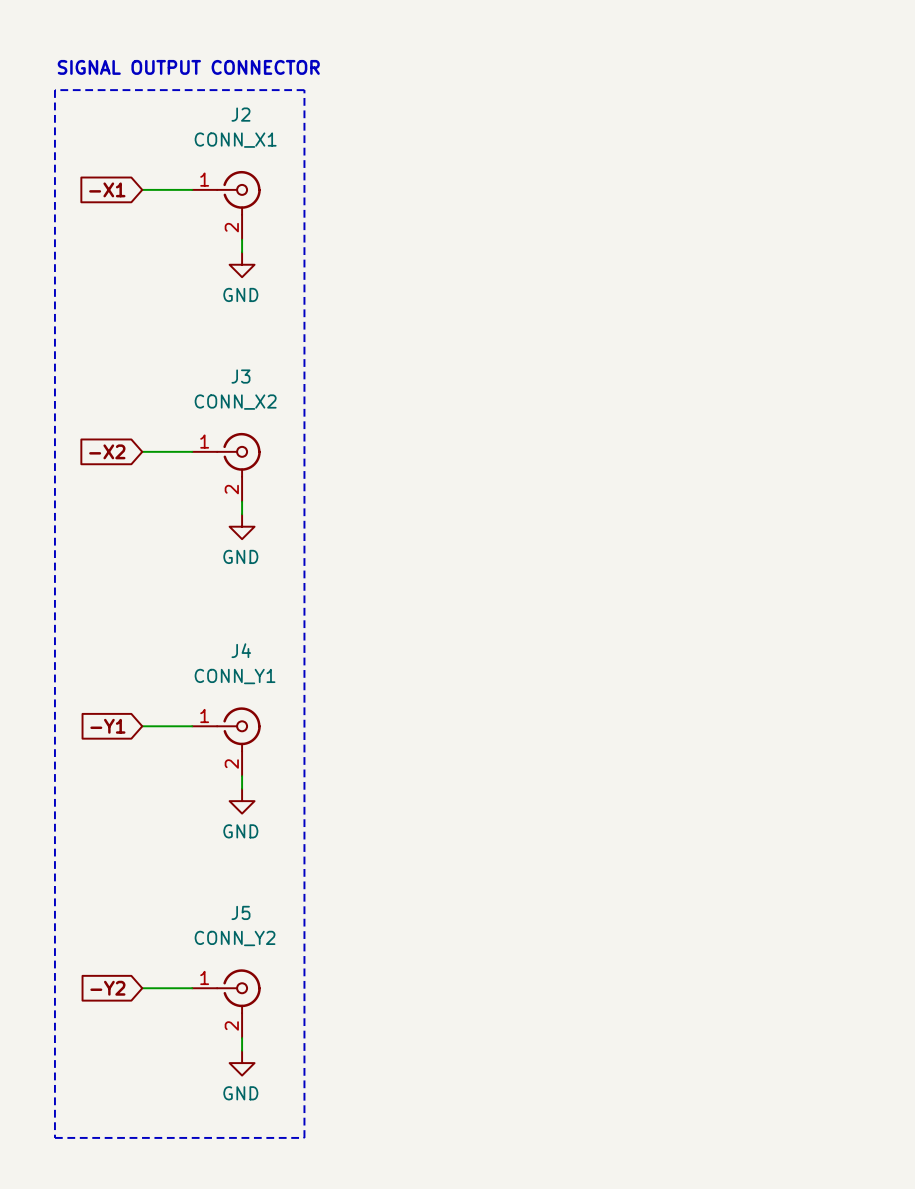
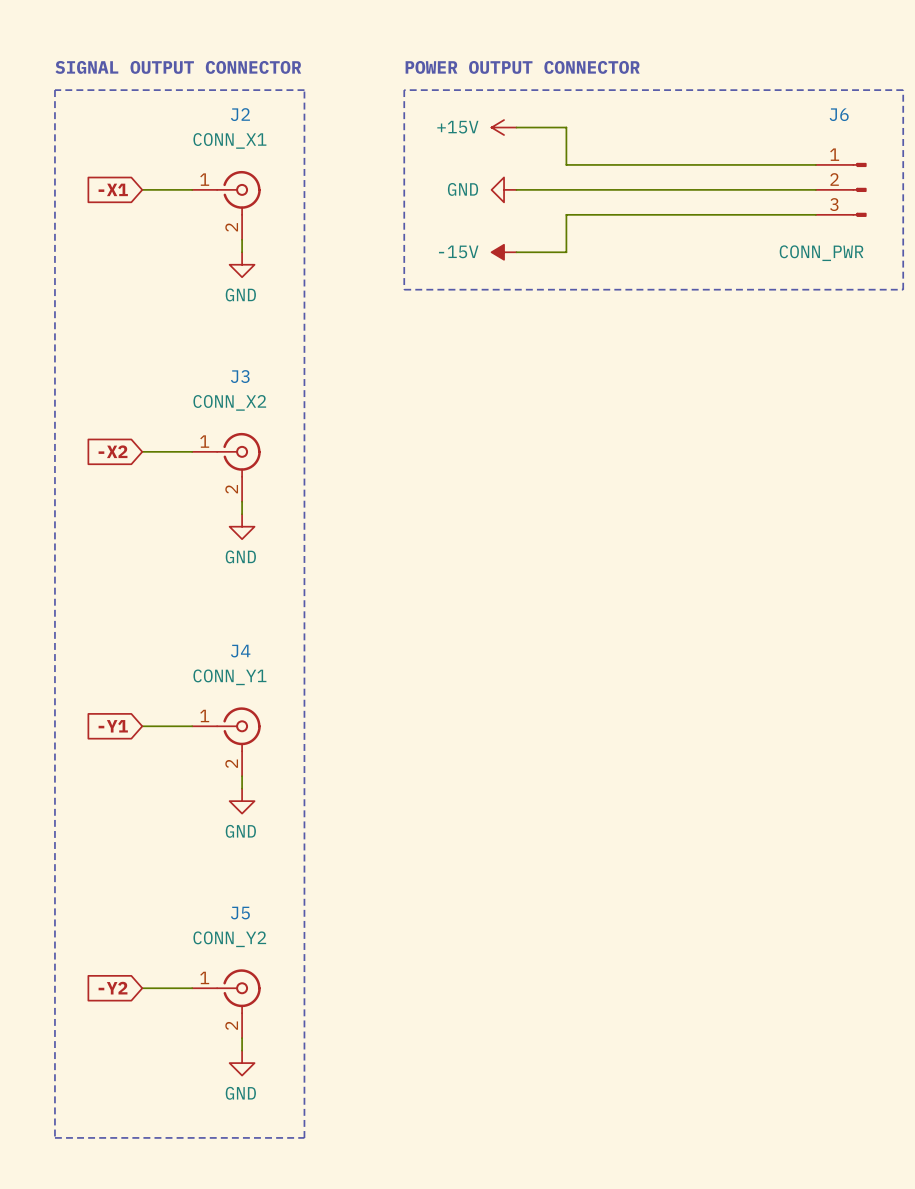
text: none -> POWER OUTPUT CONNECTOR (522, 67)
line: none -> (404, 90) (404, 289) (903, 289) (903, 90) (404, 90)
power symbol: none -> +15V (504, 127)
wire: none -> (516, 127) (566, 127) (566, 164) (815, 164)
power symbol: none -> GND (504, 189)
wire: none -> (516, 189) (815, 189)
J6: none -> CONN_PWR (841, 189)
wire: none -> (815, 214) (566, 214) (566, 252) (516, 252)
power symbol: none -> -15V (504, 252)

